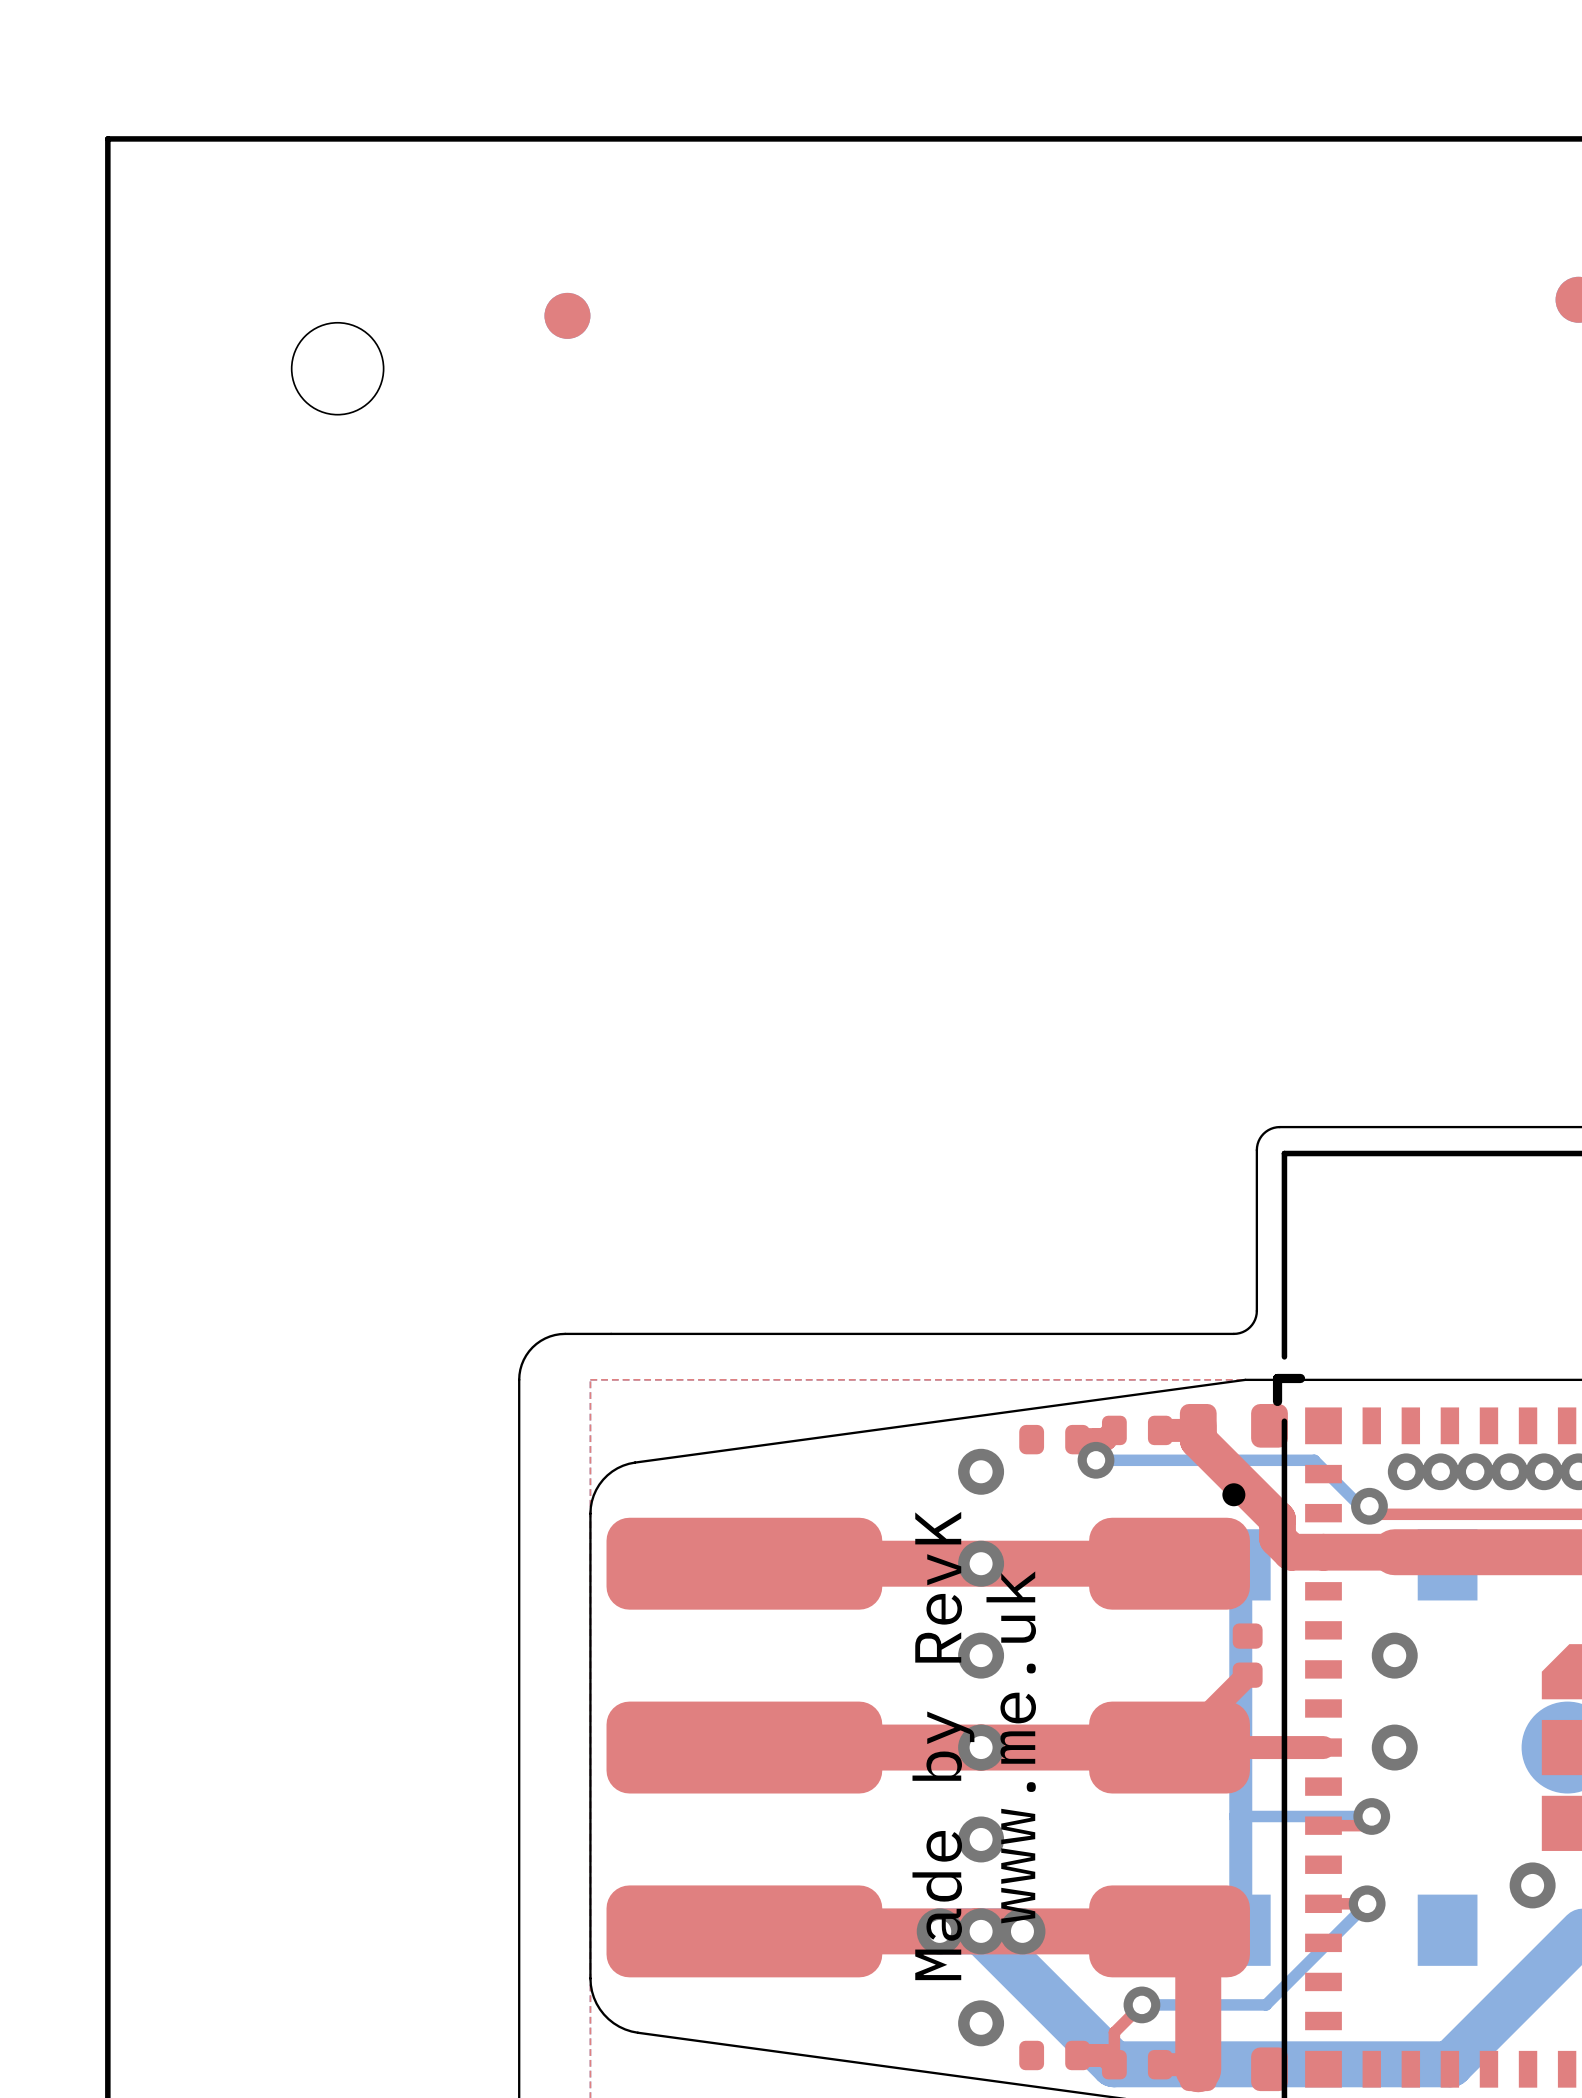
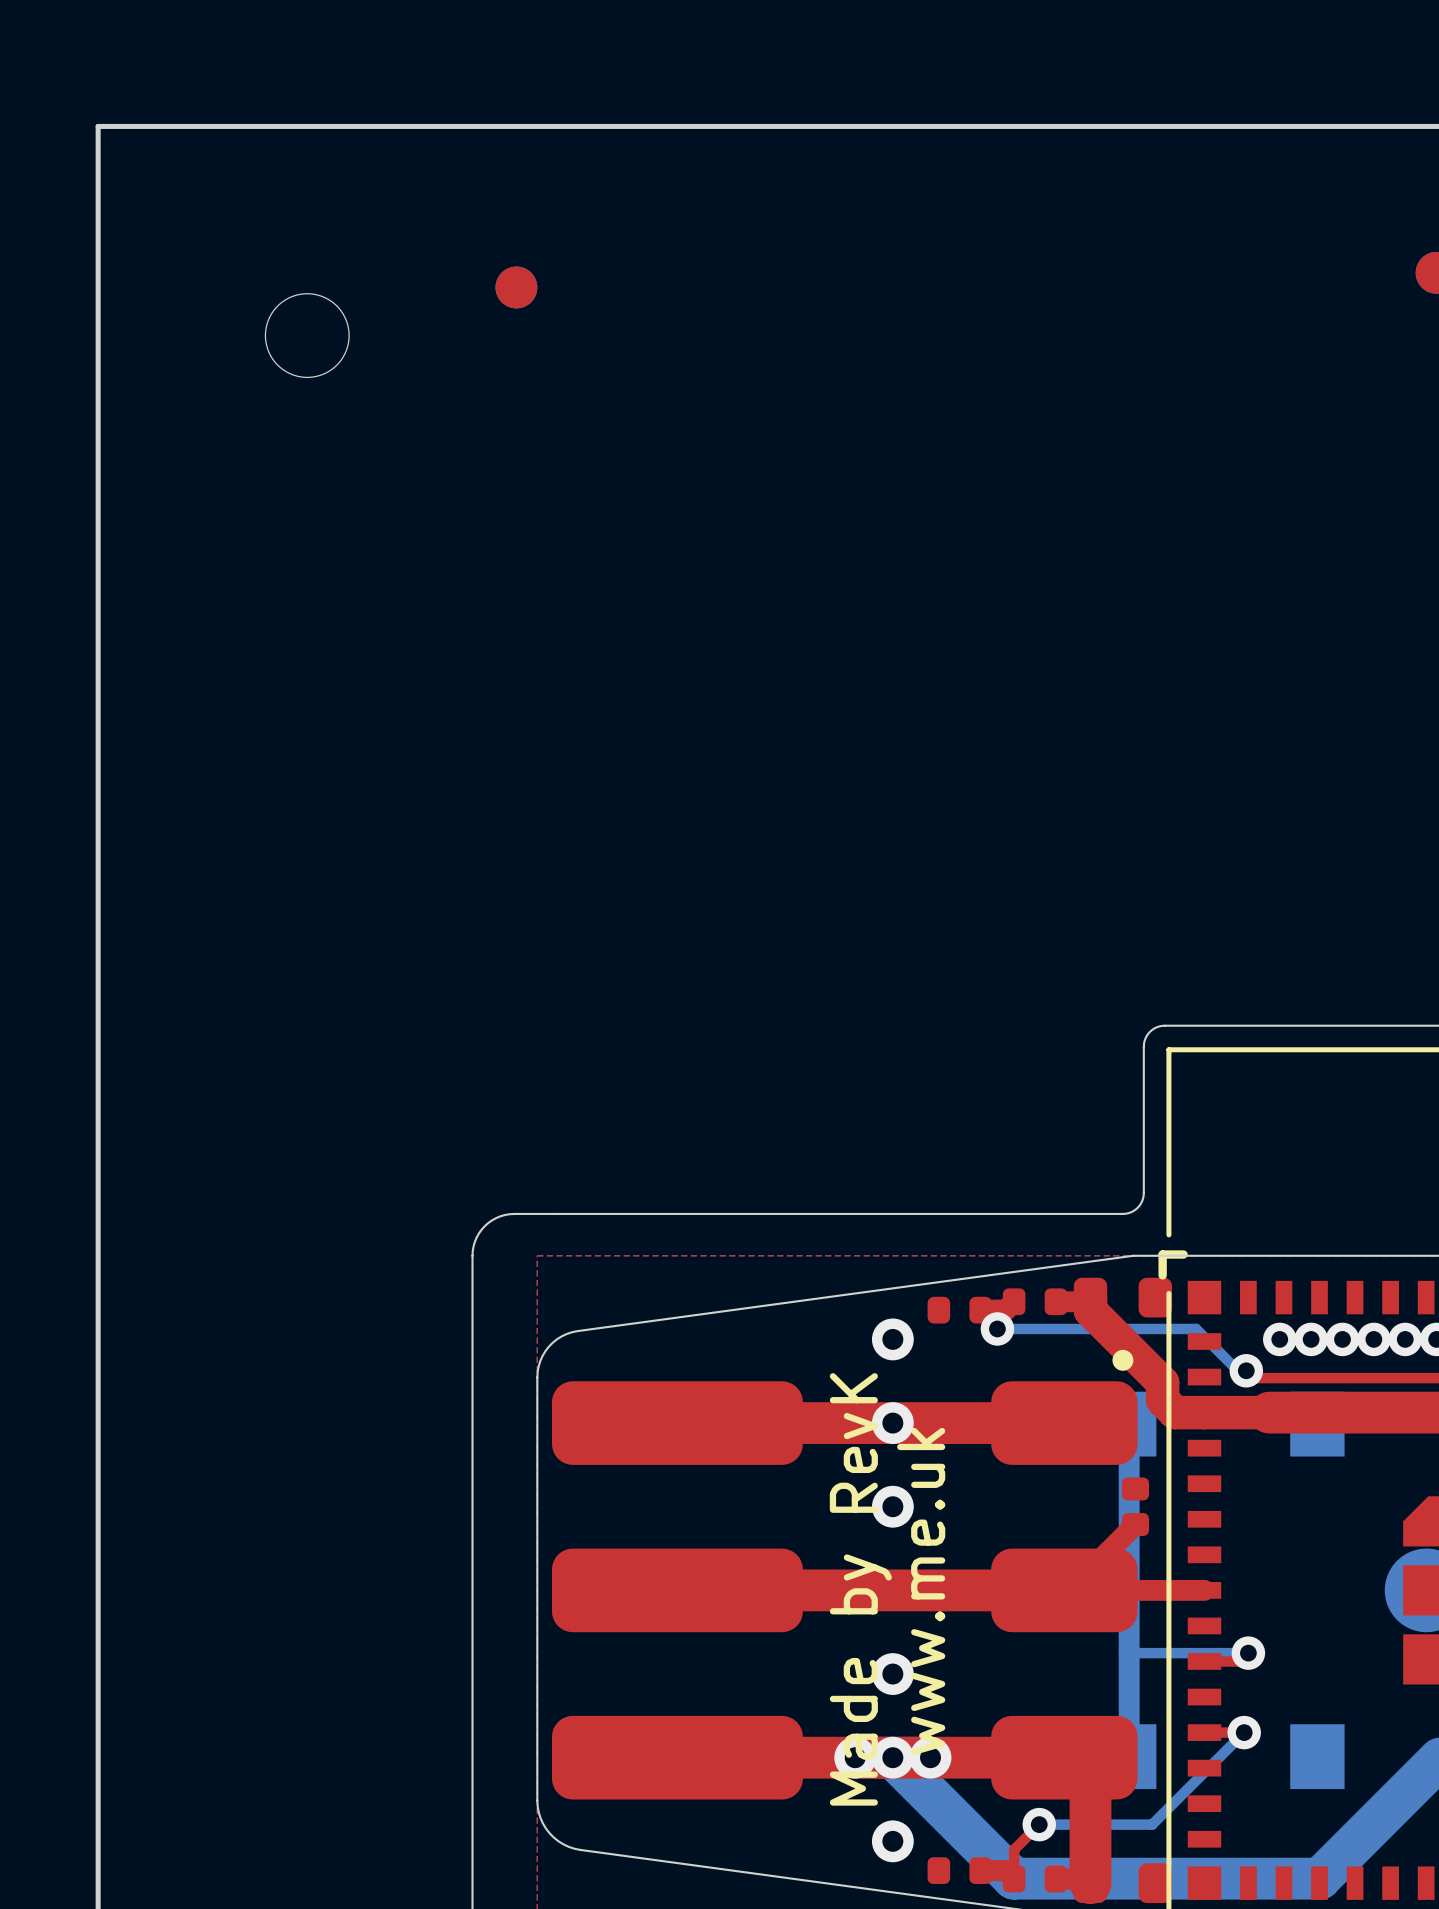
via: (1394, 1655) -> none
via: (981, 1747) -> none
via: (1394, 1747) -> none
via: (1532, 1885) -> none

